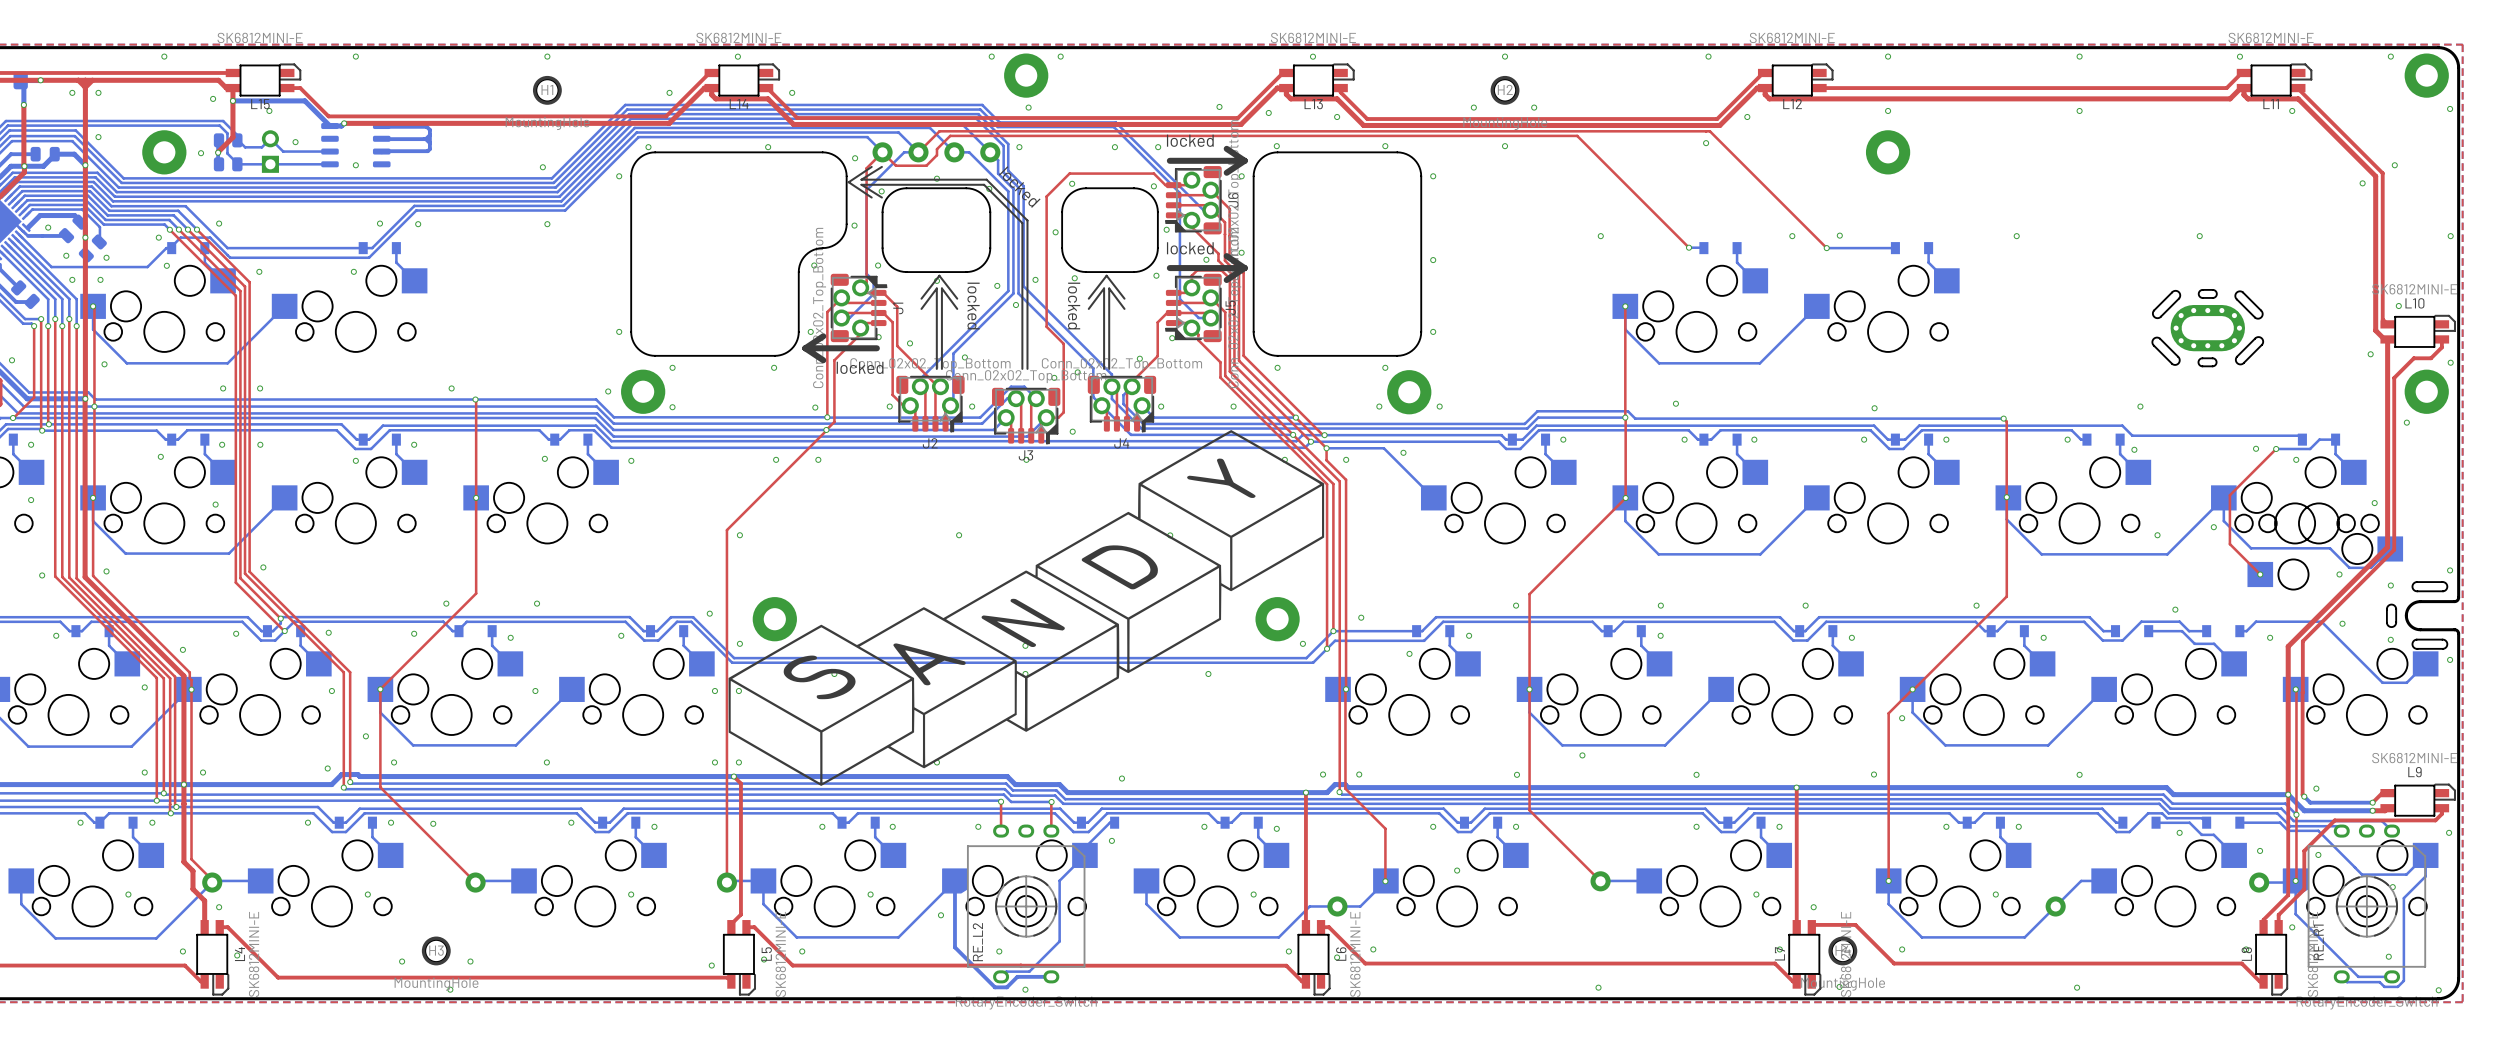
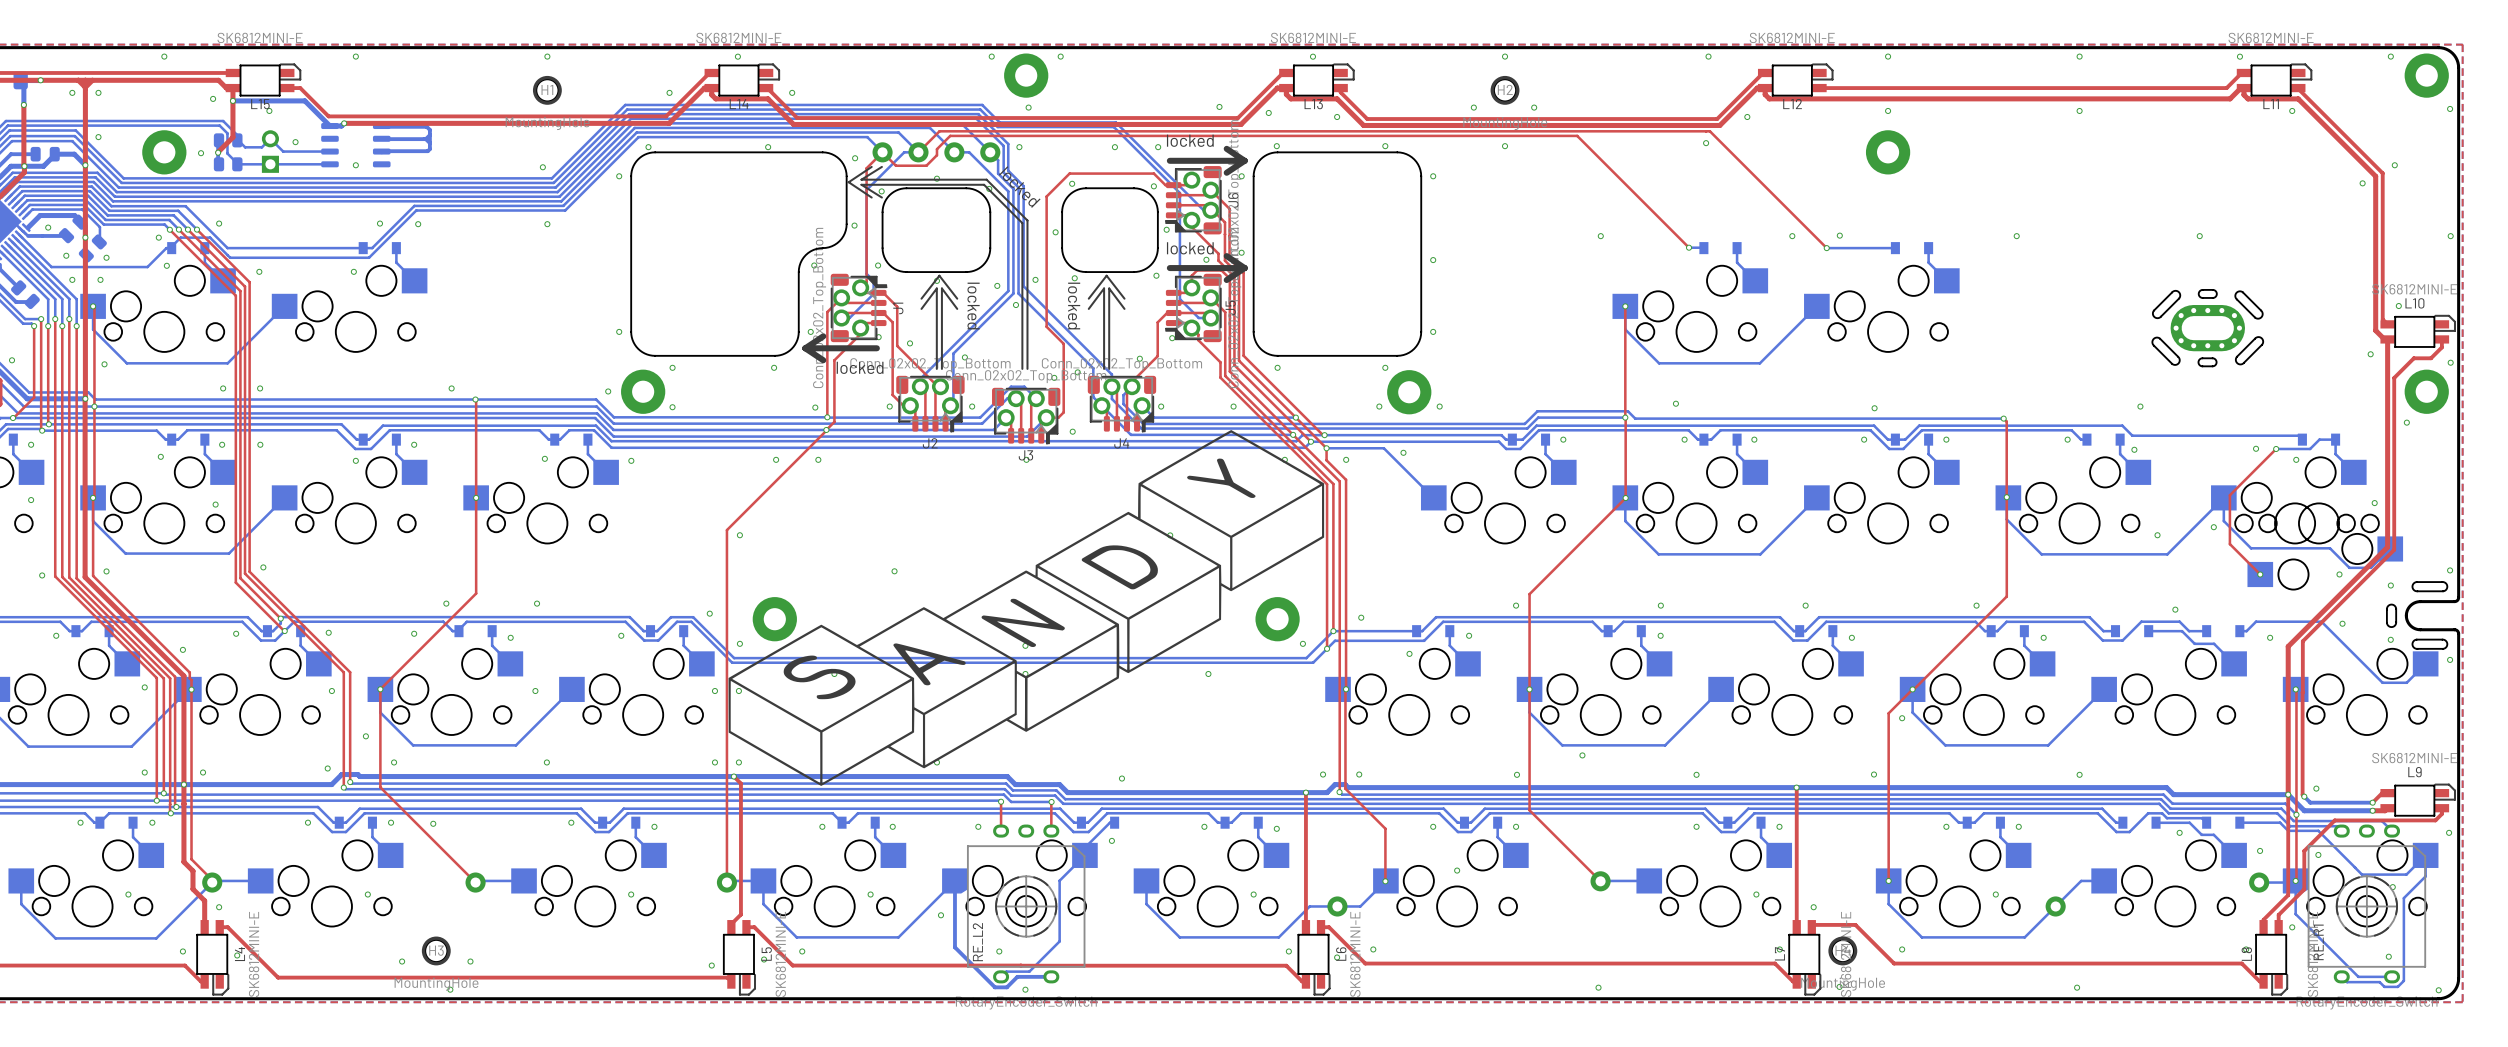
via: (959, 535) -> none
via: none -> (894, 571)

